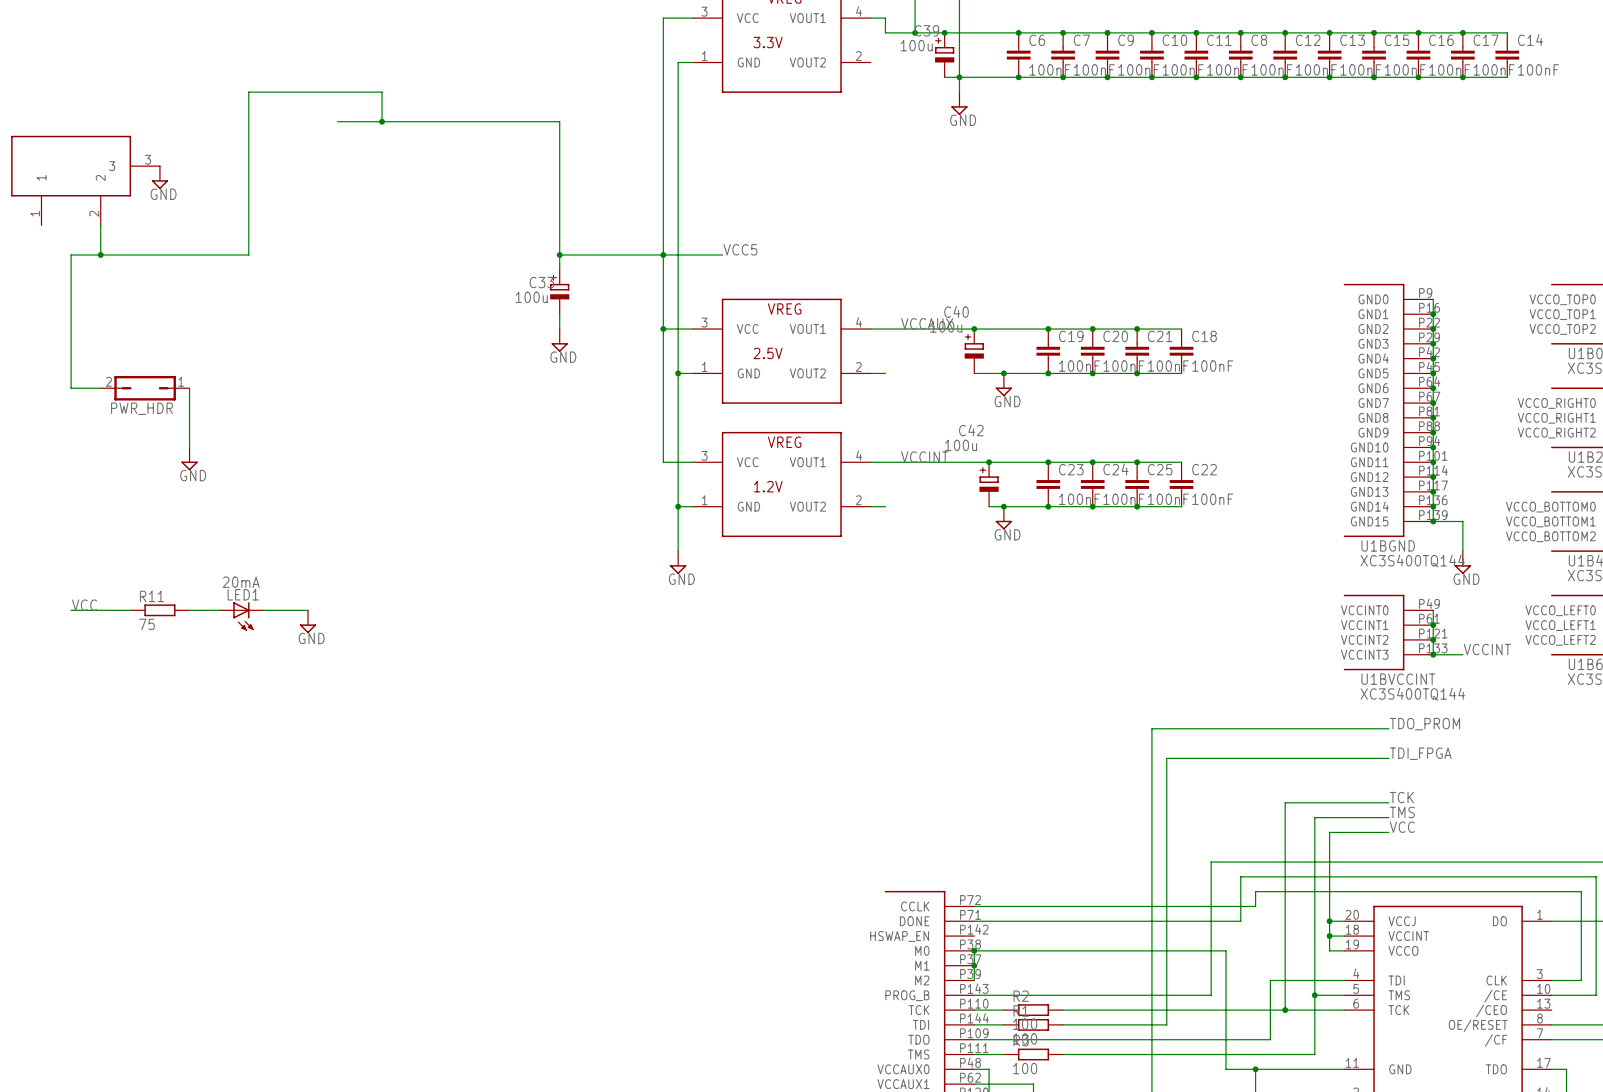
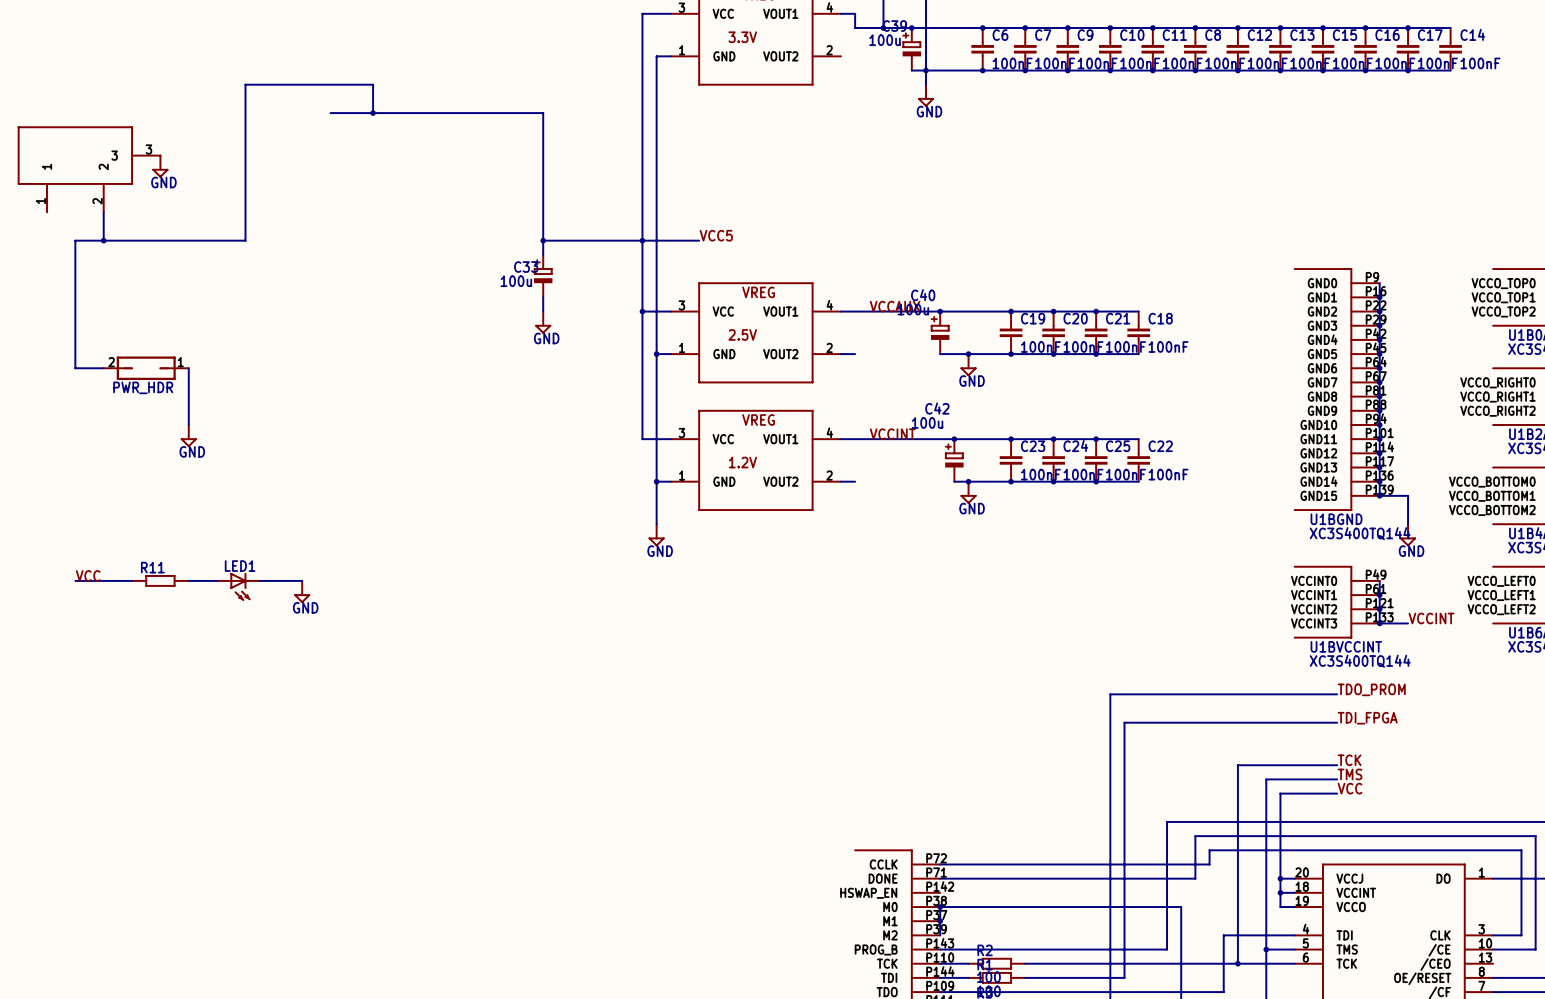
LED1 value: 20mA (241, 582) -> none
R11 value: 75 (146, 624) -> none

